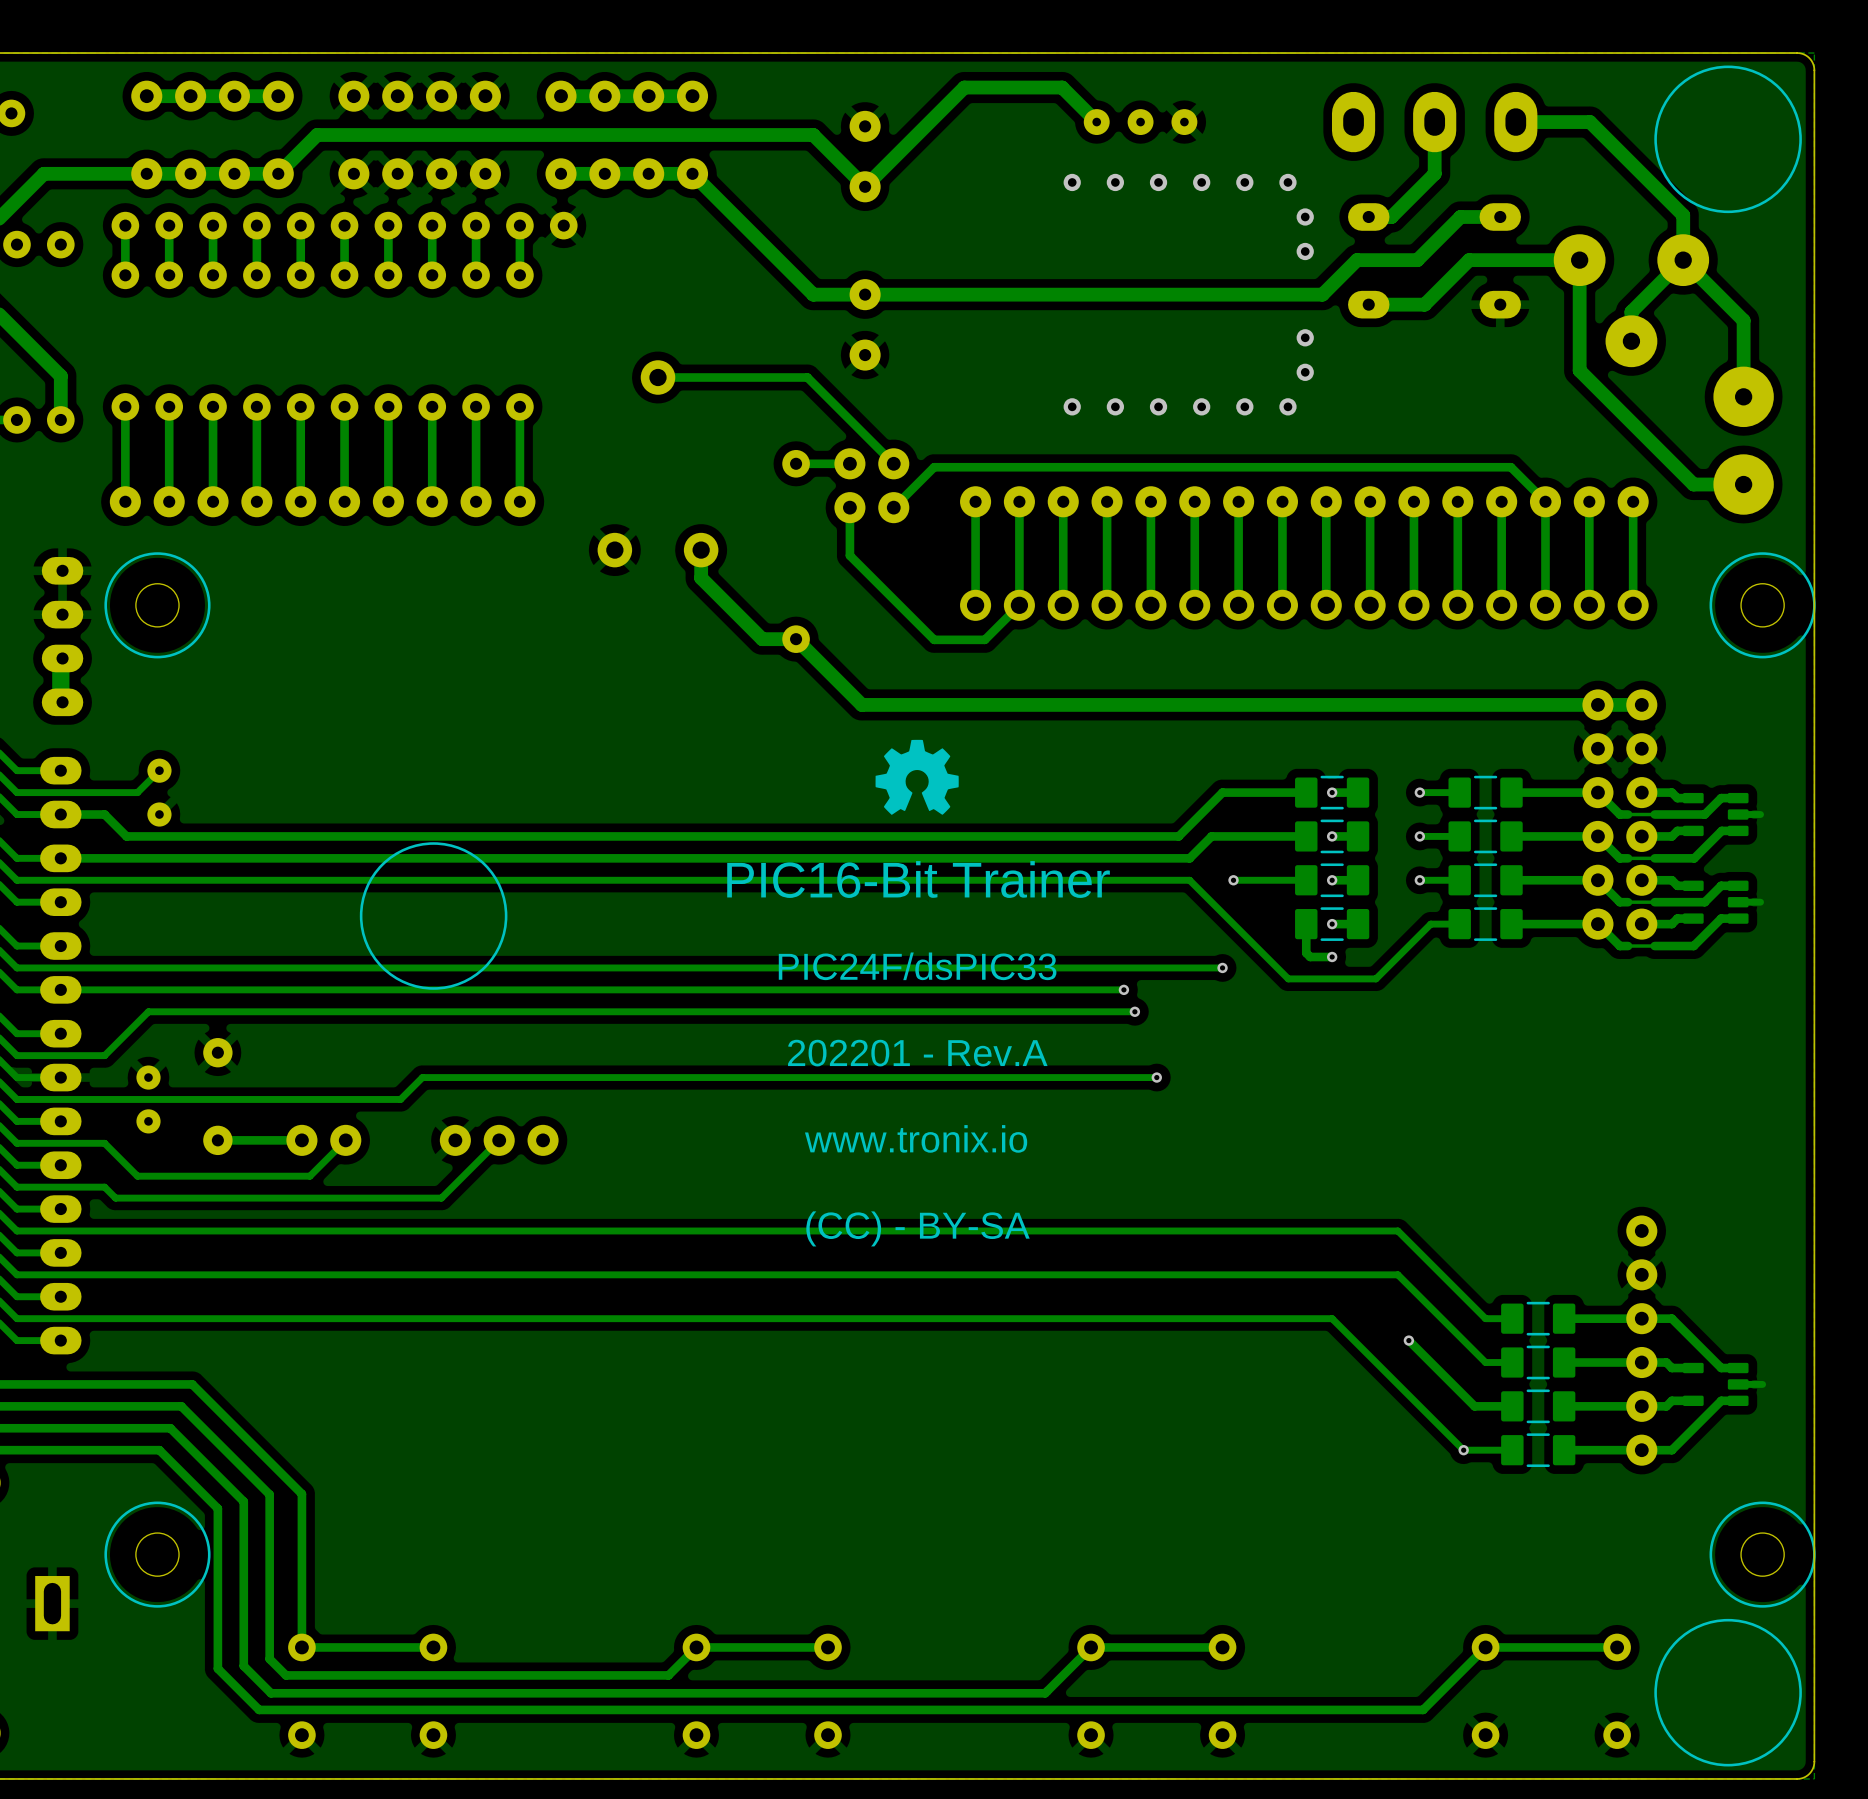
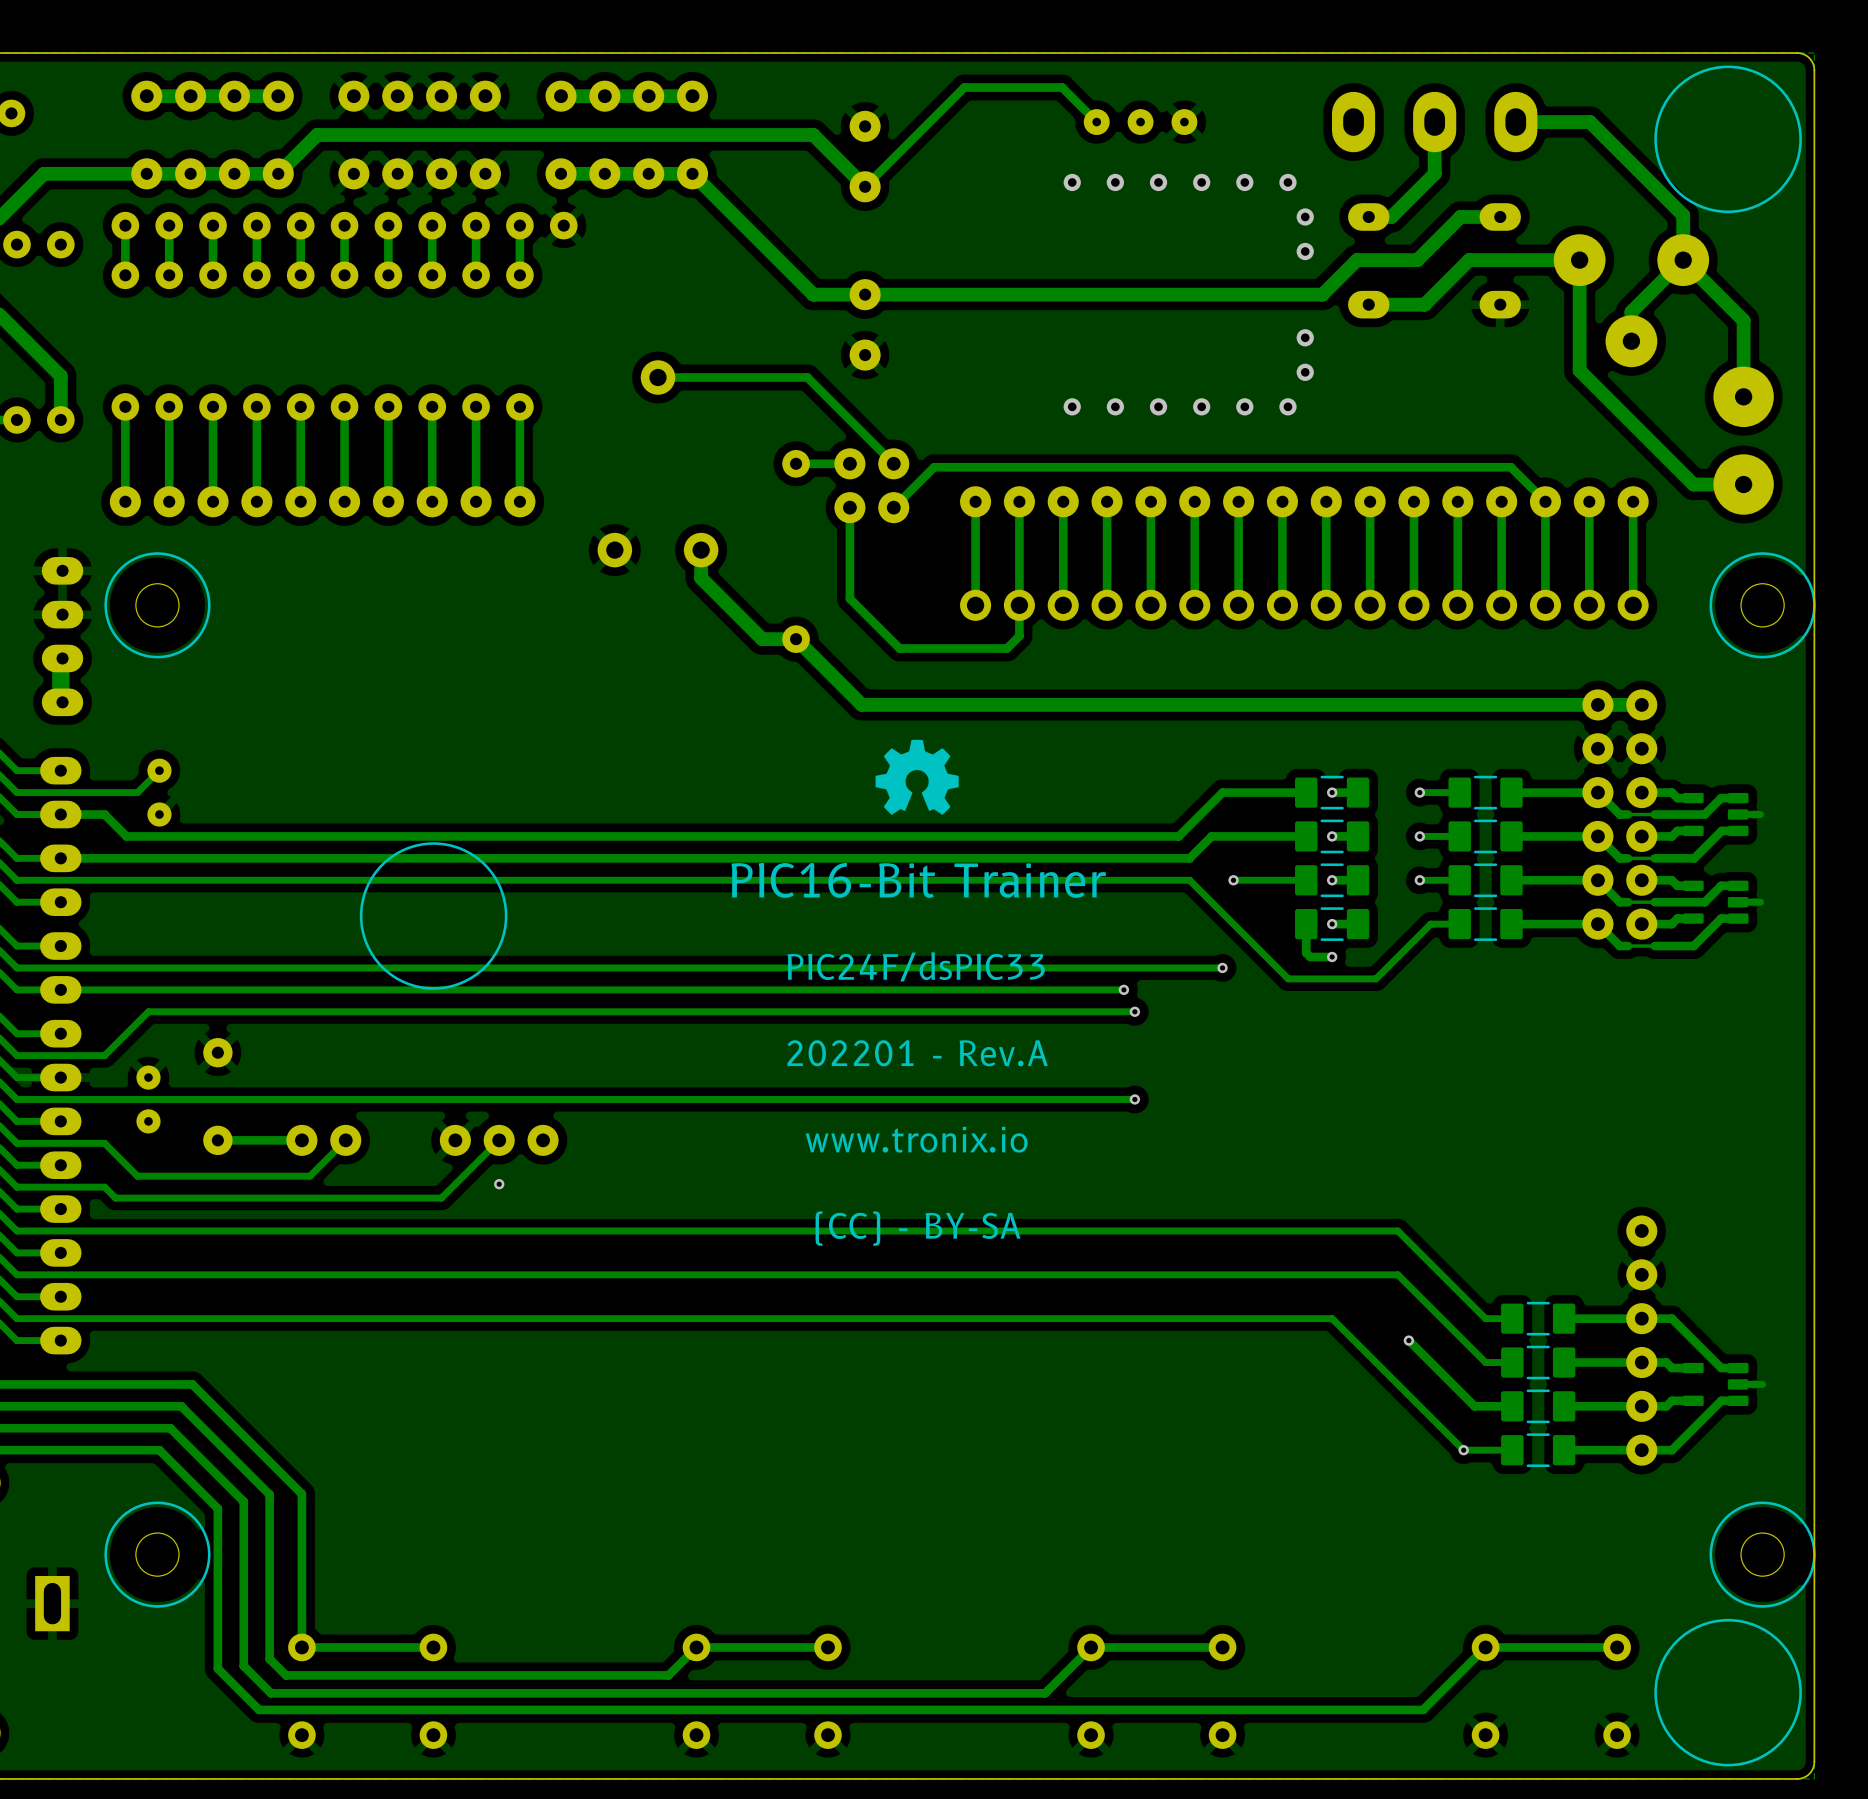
track width: thick (1096, 122) (1062, 87) (964, 87) (865, 186) -> thin (1096, 122) (1062, 87) (964, 87) (865, 186)
track: (849, 555) (934, 639) (984, 639) (1019, 605) -> (849, 555) (849, 598) (899, 648) (1007, 648) (1019, 636) (1019, 605)
track: (1156, 1077) (422, 1077) (400, 1099) -> (1134, 1099) (400, 1099)
via position: (1156, 1077) -> (1134, 1099)
via: none -> (499, 1184)

